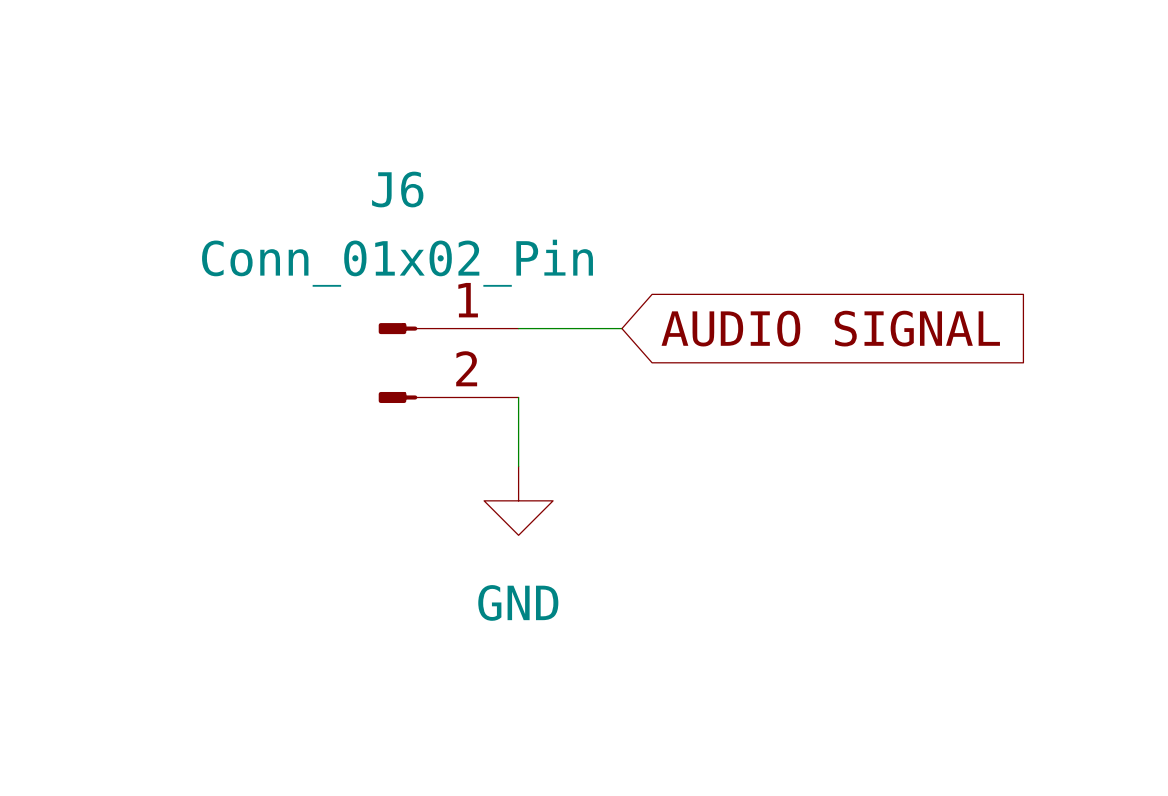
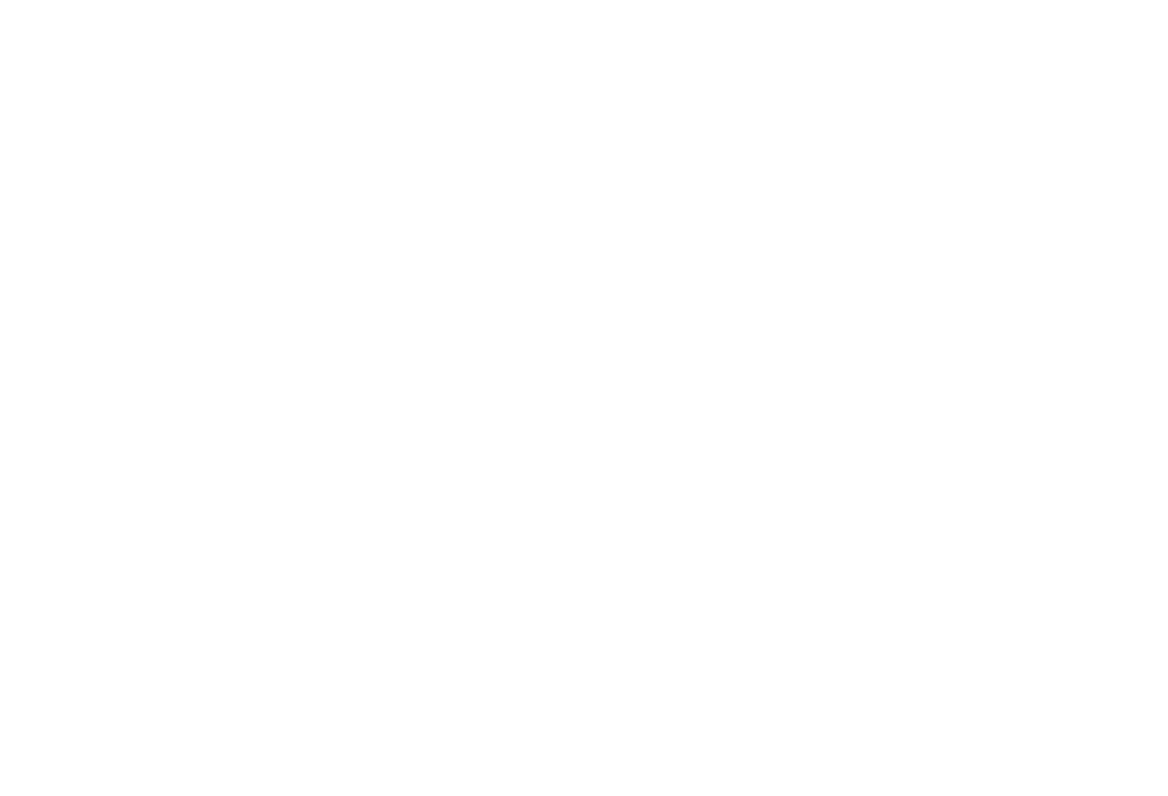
wire: (518, 328) (621, 328) -> none
global label: AUDIO SIGNAL (830, 328) -> none
J6: Conn_01x02_Pin (448, 363) -> none
wire: (518, 397) (518, 466) -> none
power symbol: GND (518, 500) -> none

